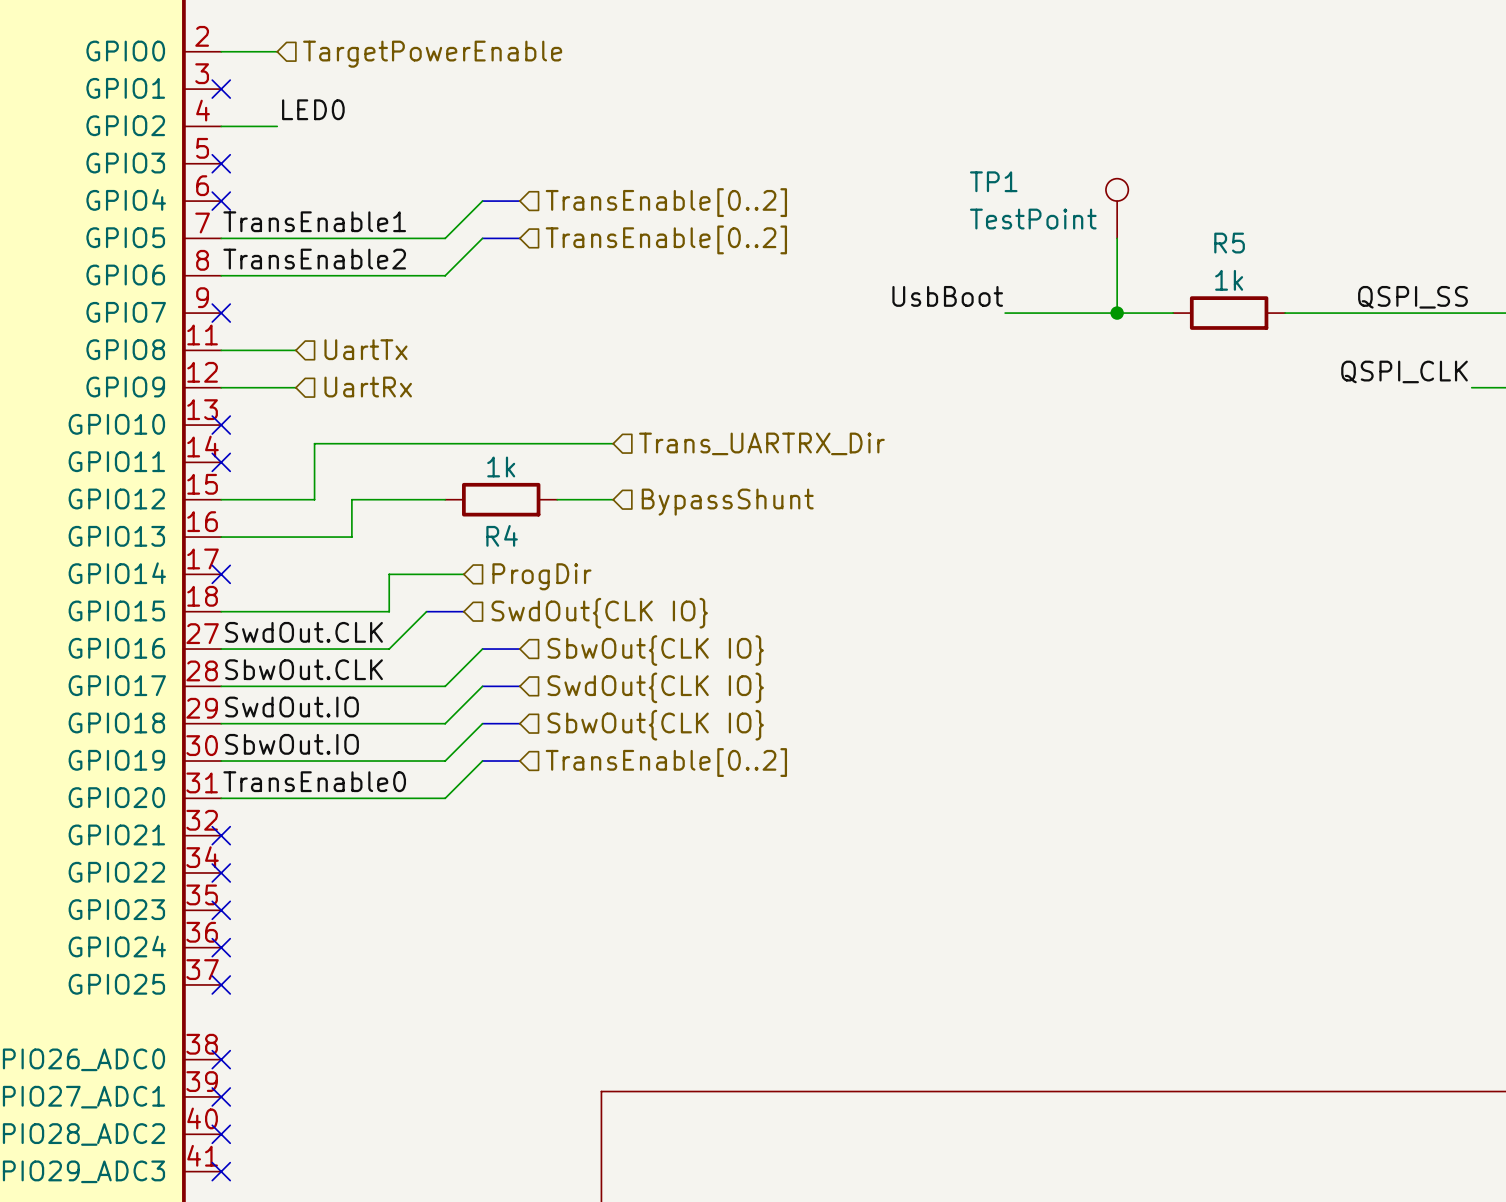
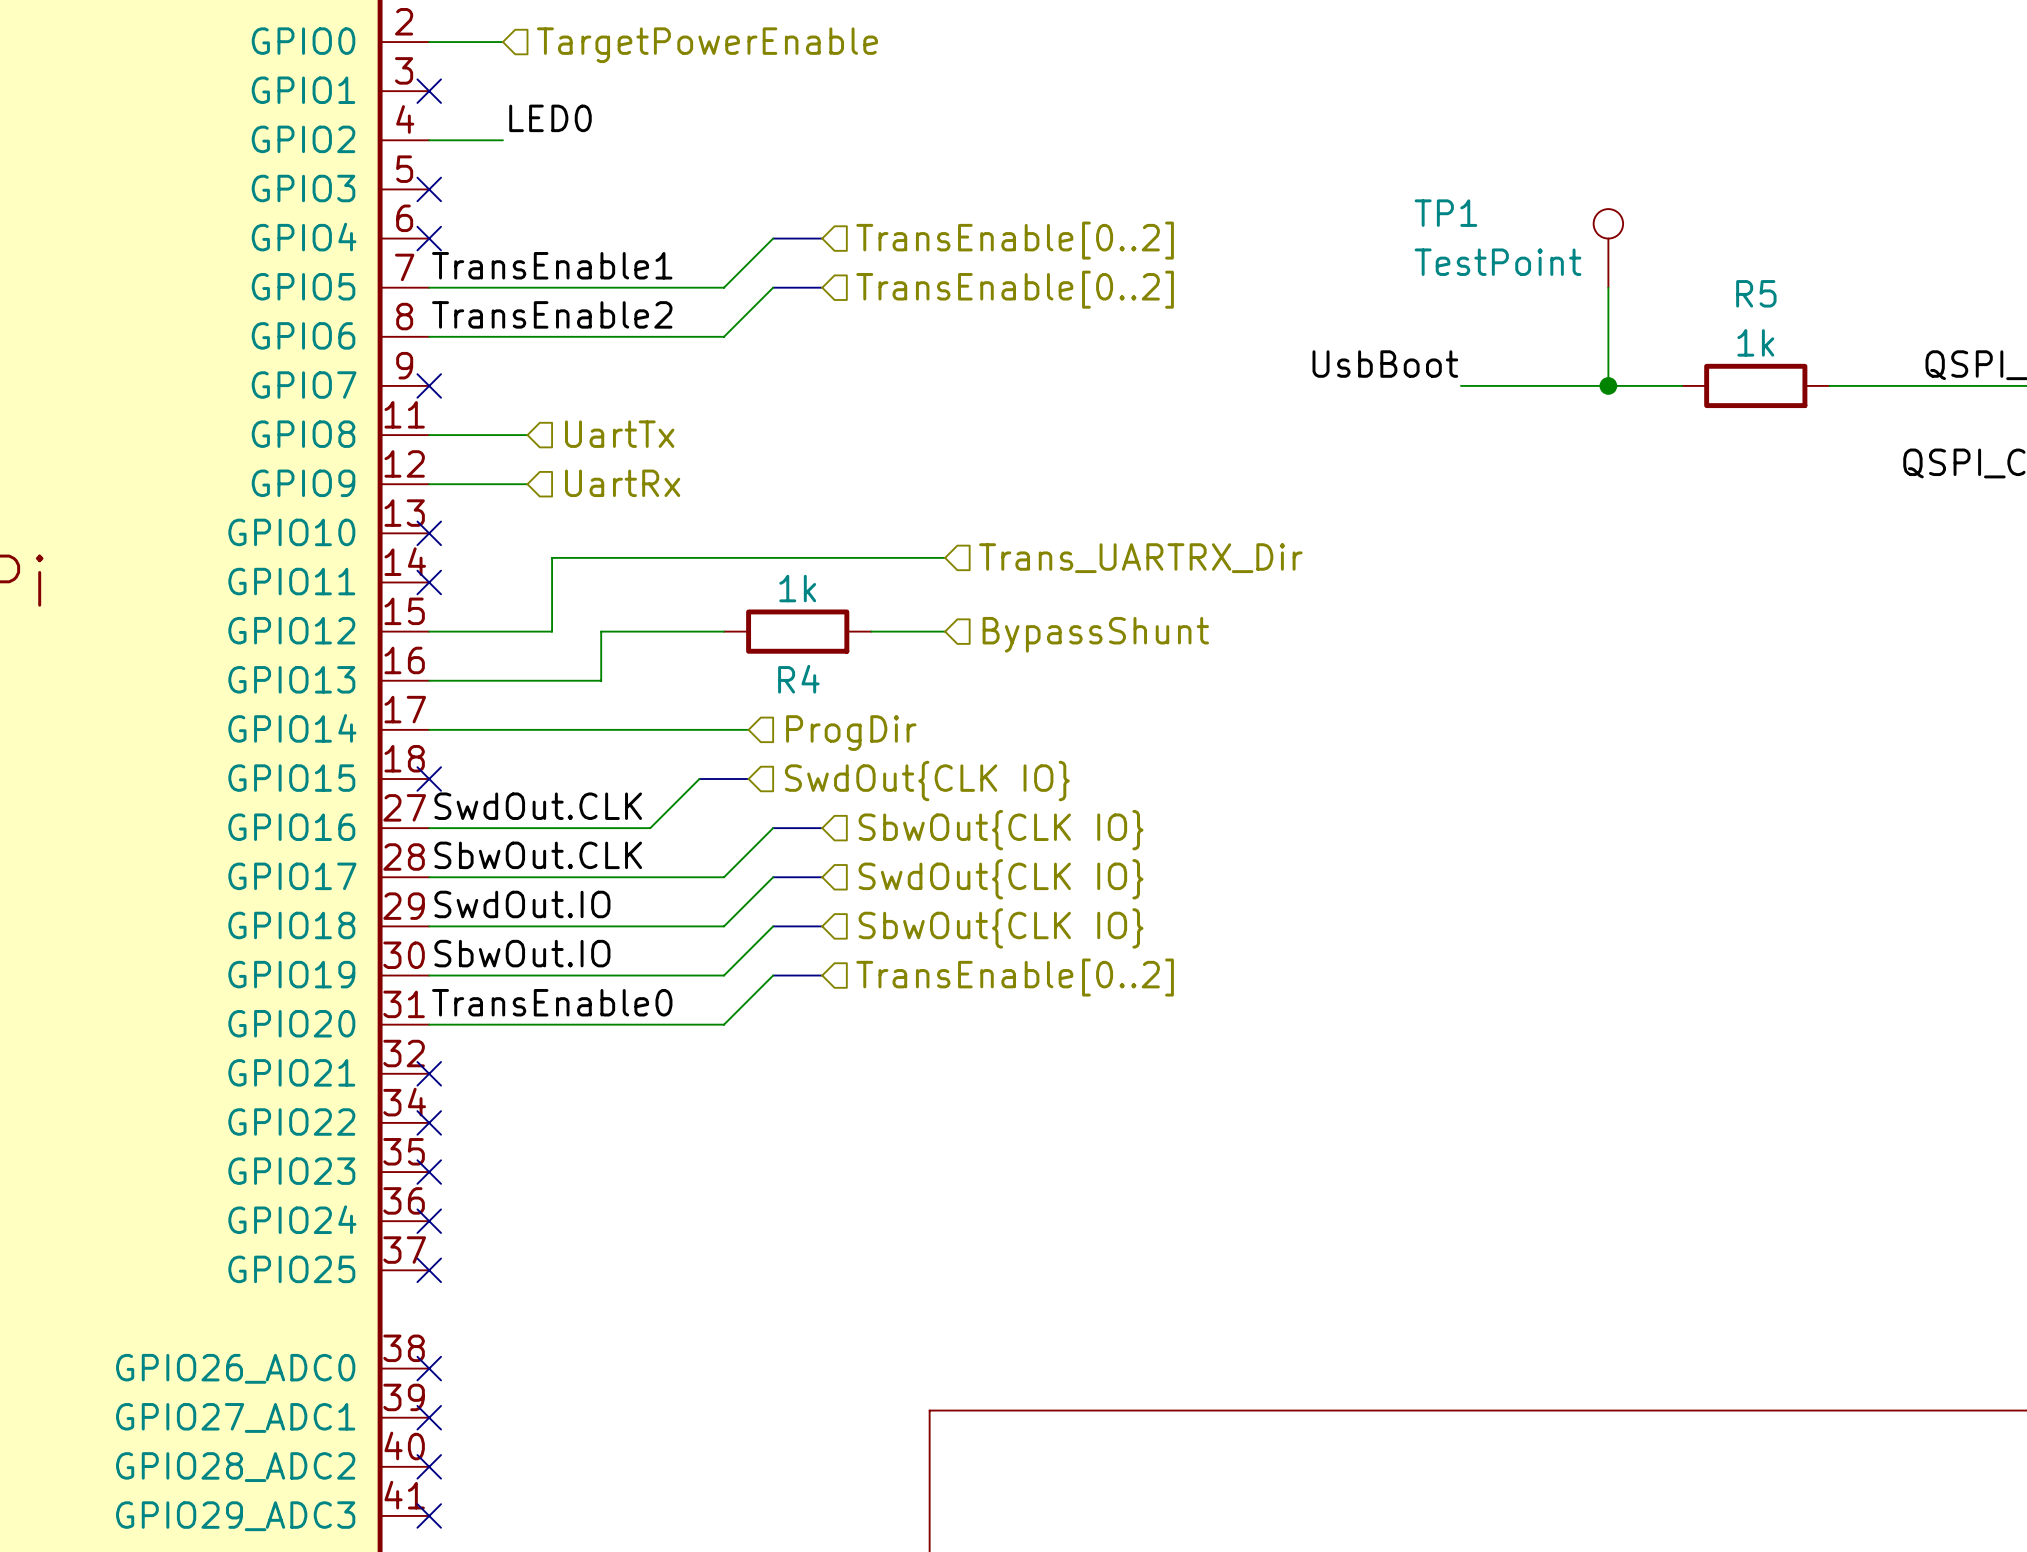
no-connect mark position: (221, 574) -> (429, 779)
wire: (389, 574) (389, 611) (221, 611) -> (650, 729) (429, 729)

